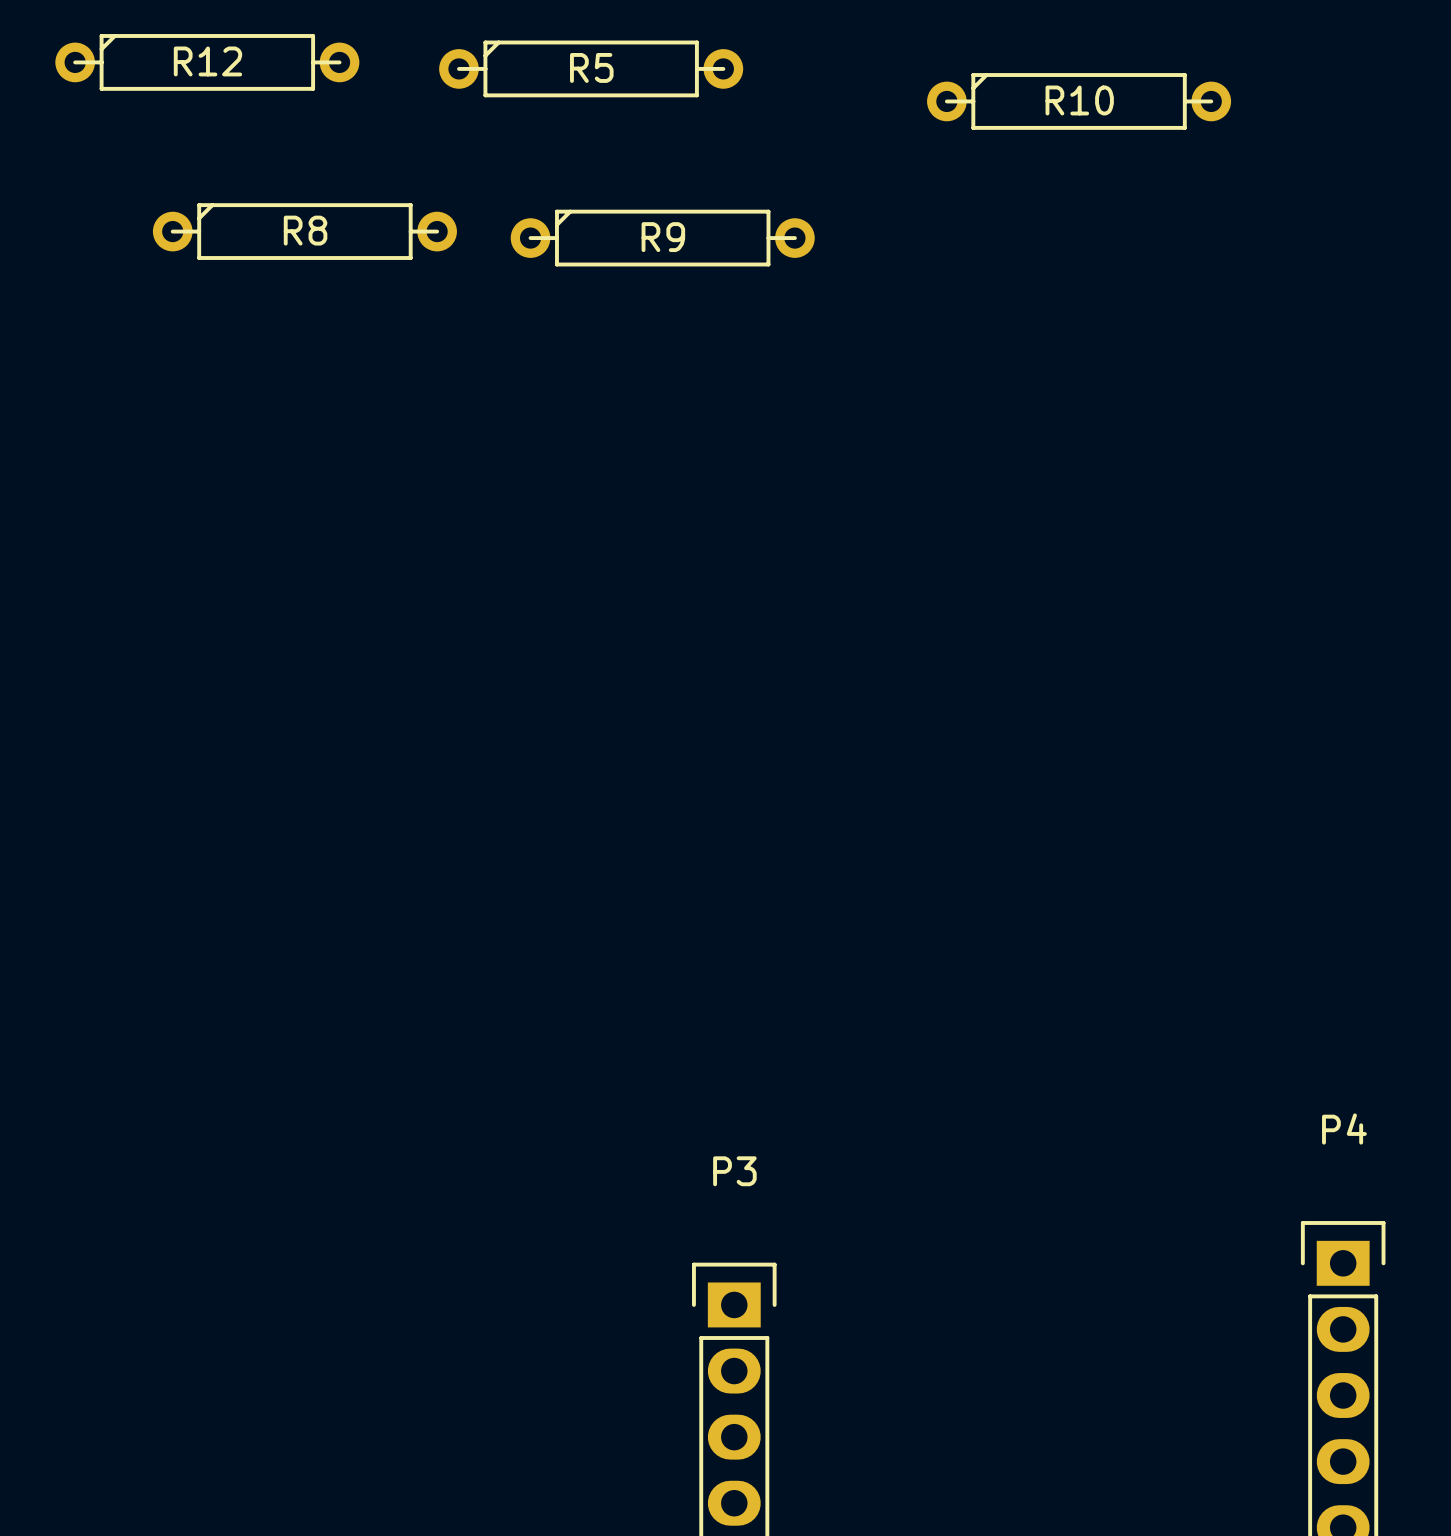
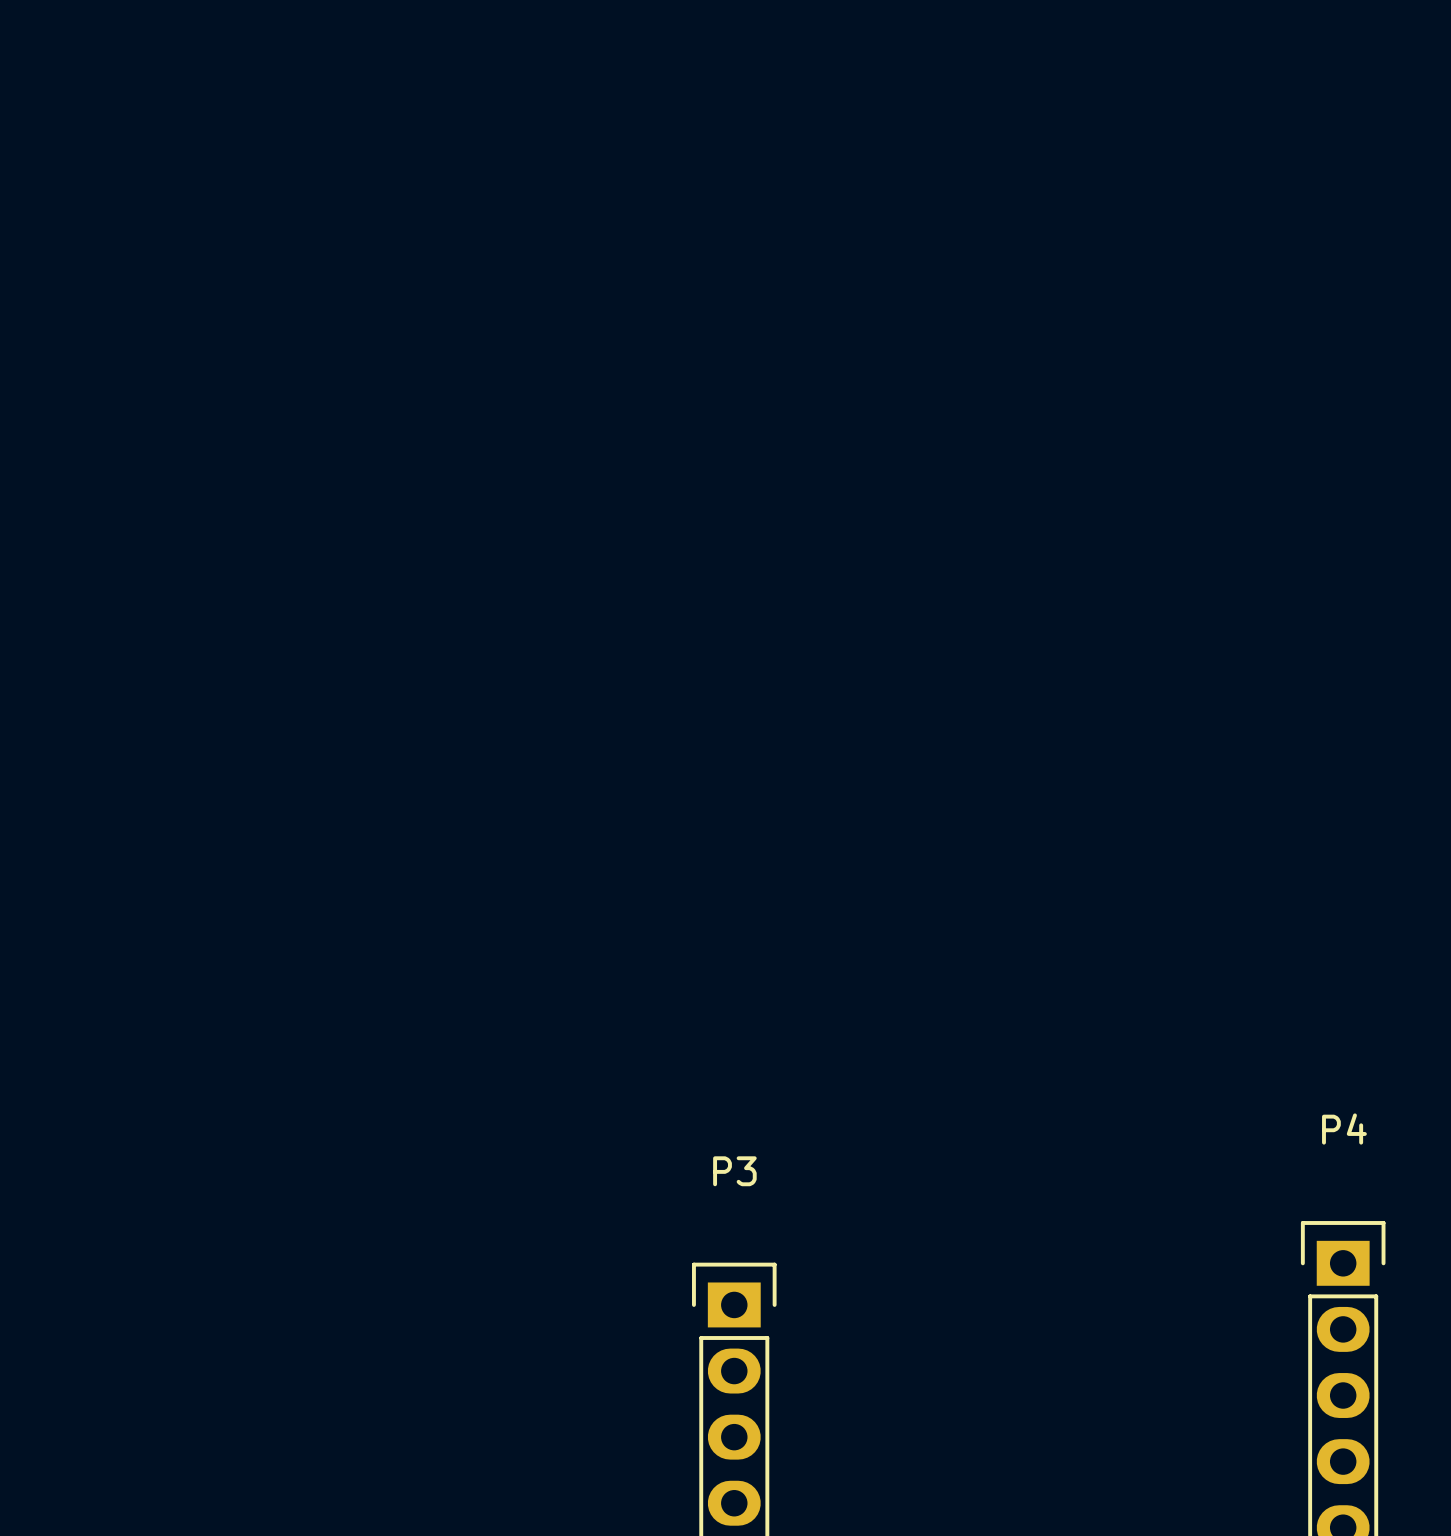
R12: (207, 62) -> none
R5: (591, 68) -> none
R10: (1079, 101) -> none
R8: (304, 231) -> none
R9: (662, 238) -> none

